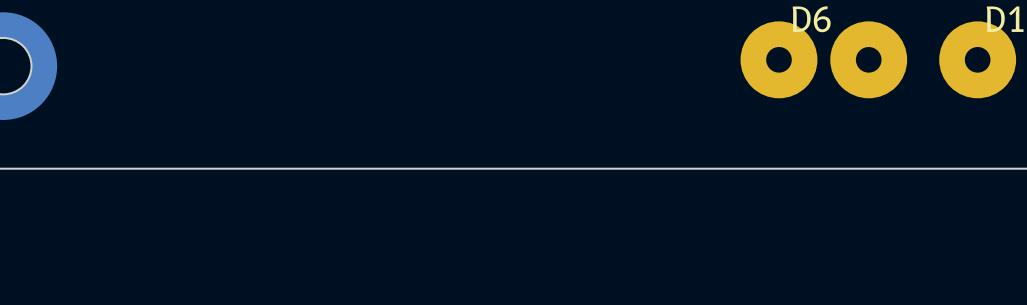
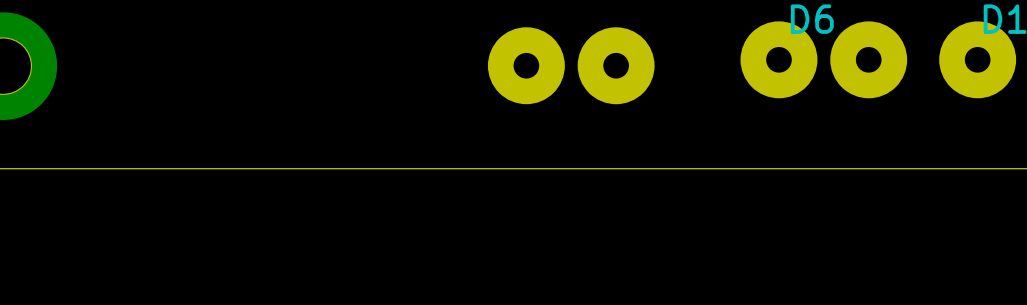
part: none -> (571, 65)

